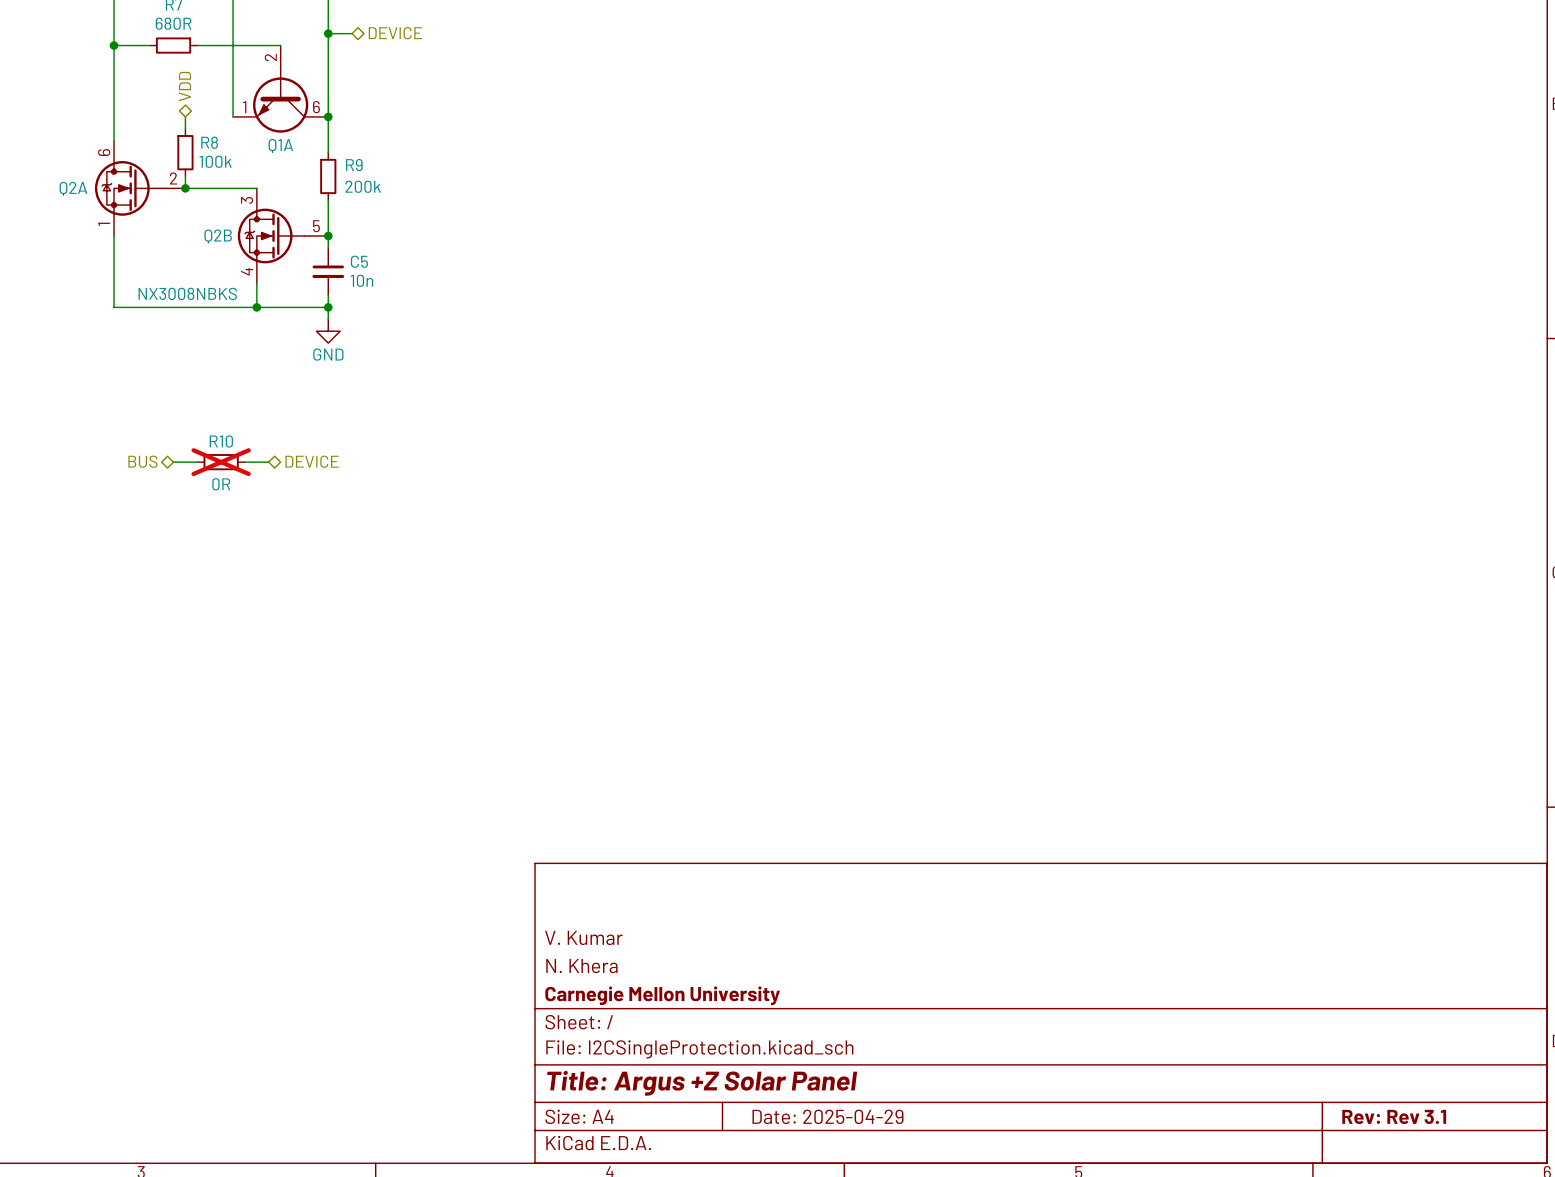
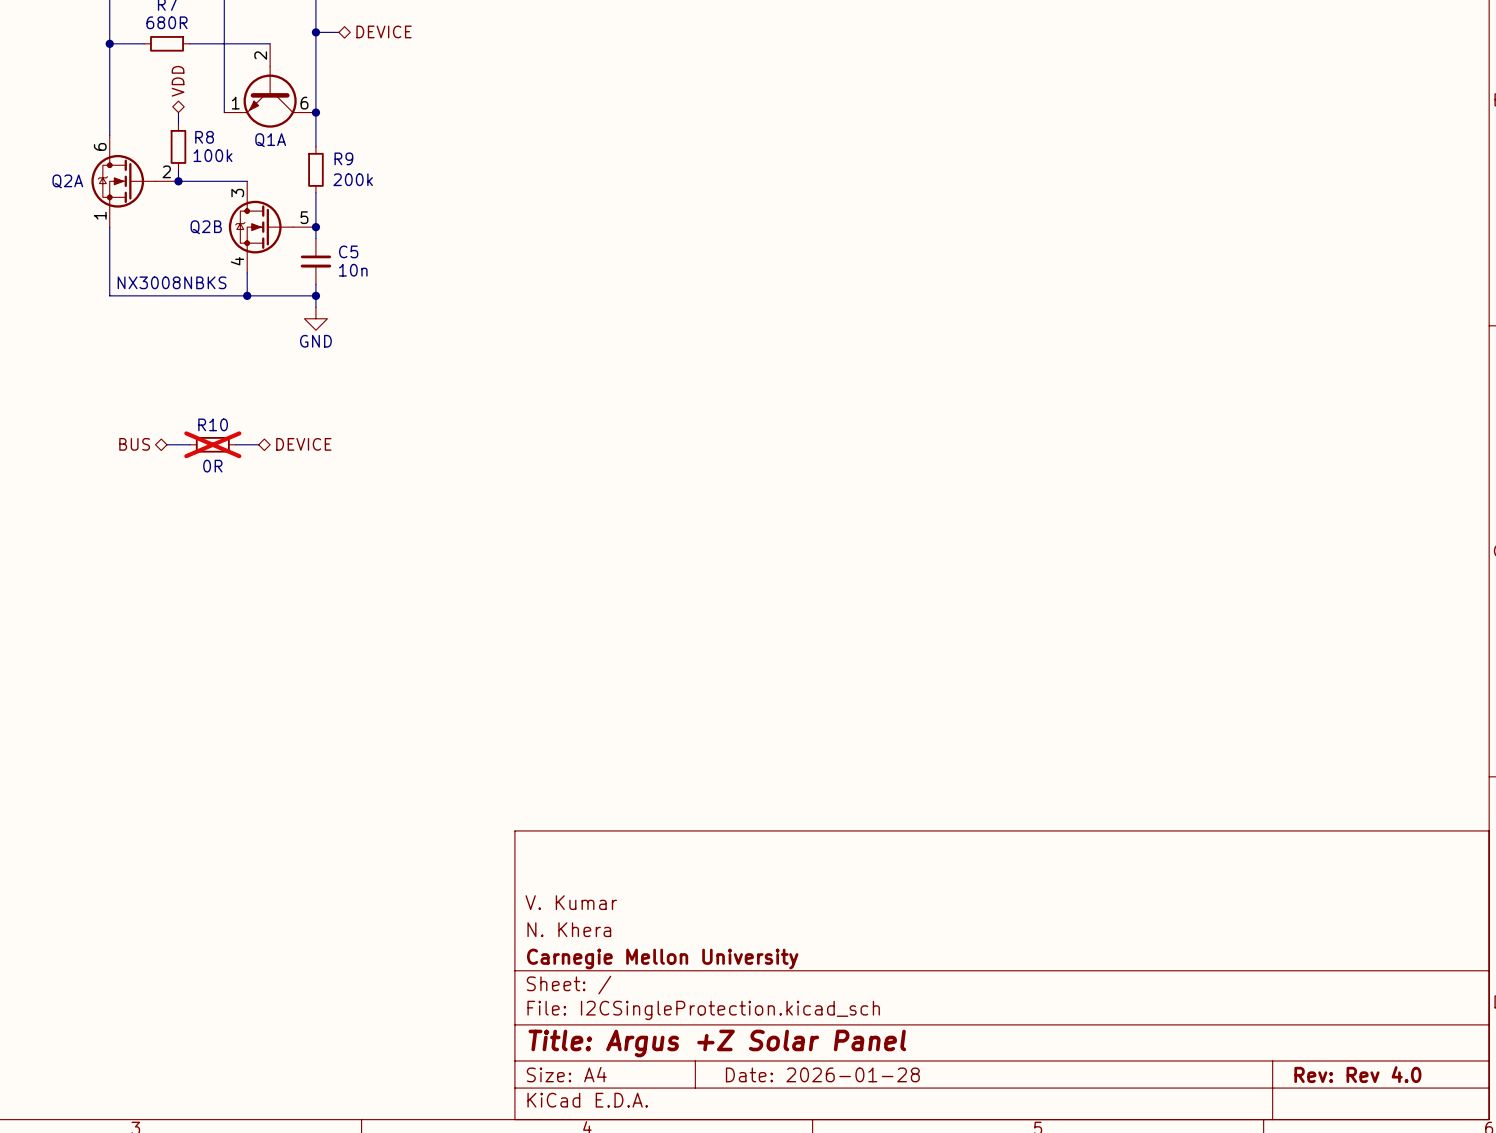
title block: Date: 2025-04-29 (827, 1116) -> Date: 2026-01-28 (822, 1074)
title block: Rev: Rev 3.1 (1394, 1116) -> Rev: Rev 4.0 (1357, 1074)

